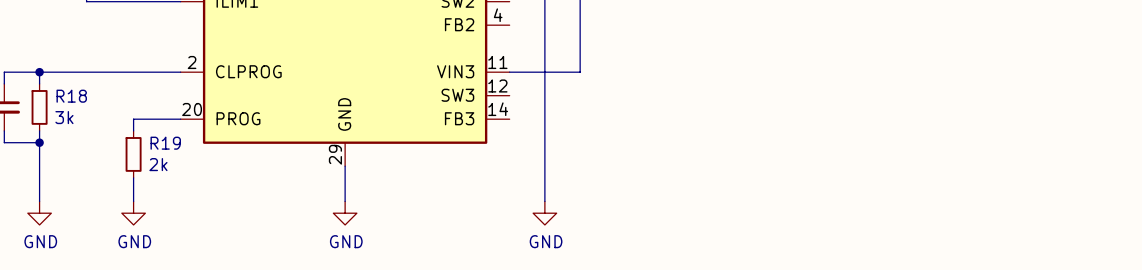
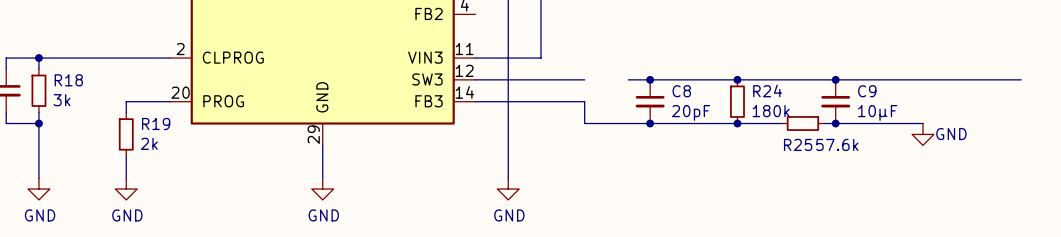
wire: none -> (475, 79) (584, 79)
wire: none -> (628, 79) (1021, 79)
junction: none -> (650, 79)
junction: none -> (737, 79)
junction: none -> (835, 79)
wire: none -> (475, 101) (584, 101) (584, 123) (781, 123)
C8: none -> 20pF (650, 101)
R24: none -> 180k (737, 101)
C9: none -> 10µF (835, 101)
junction: none -> (650, 123)
junction: none -> (737, 123)
R25: none -> 57.6k (802, 123)
wire: none -> (824, 123) (923, 123)
junction: none -> (835, 123)
power symbol: none -> GND (923, 134)

